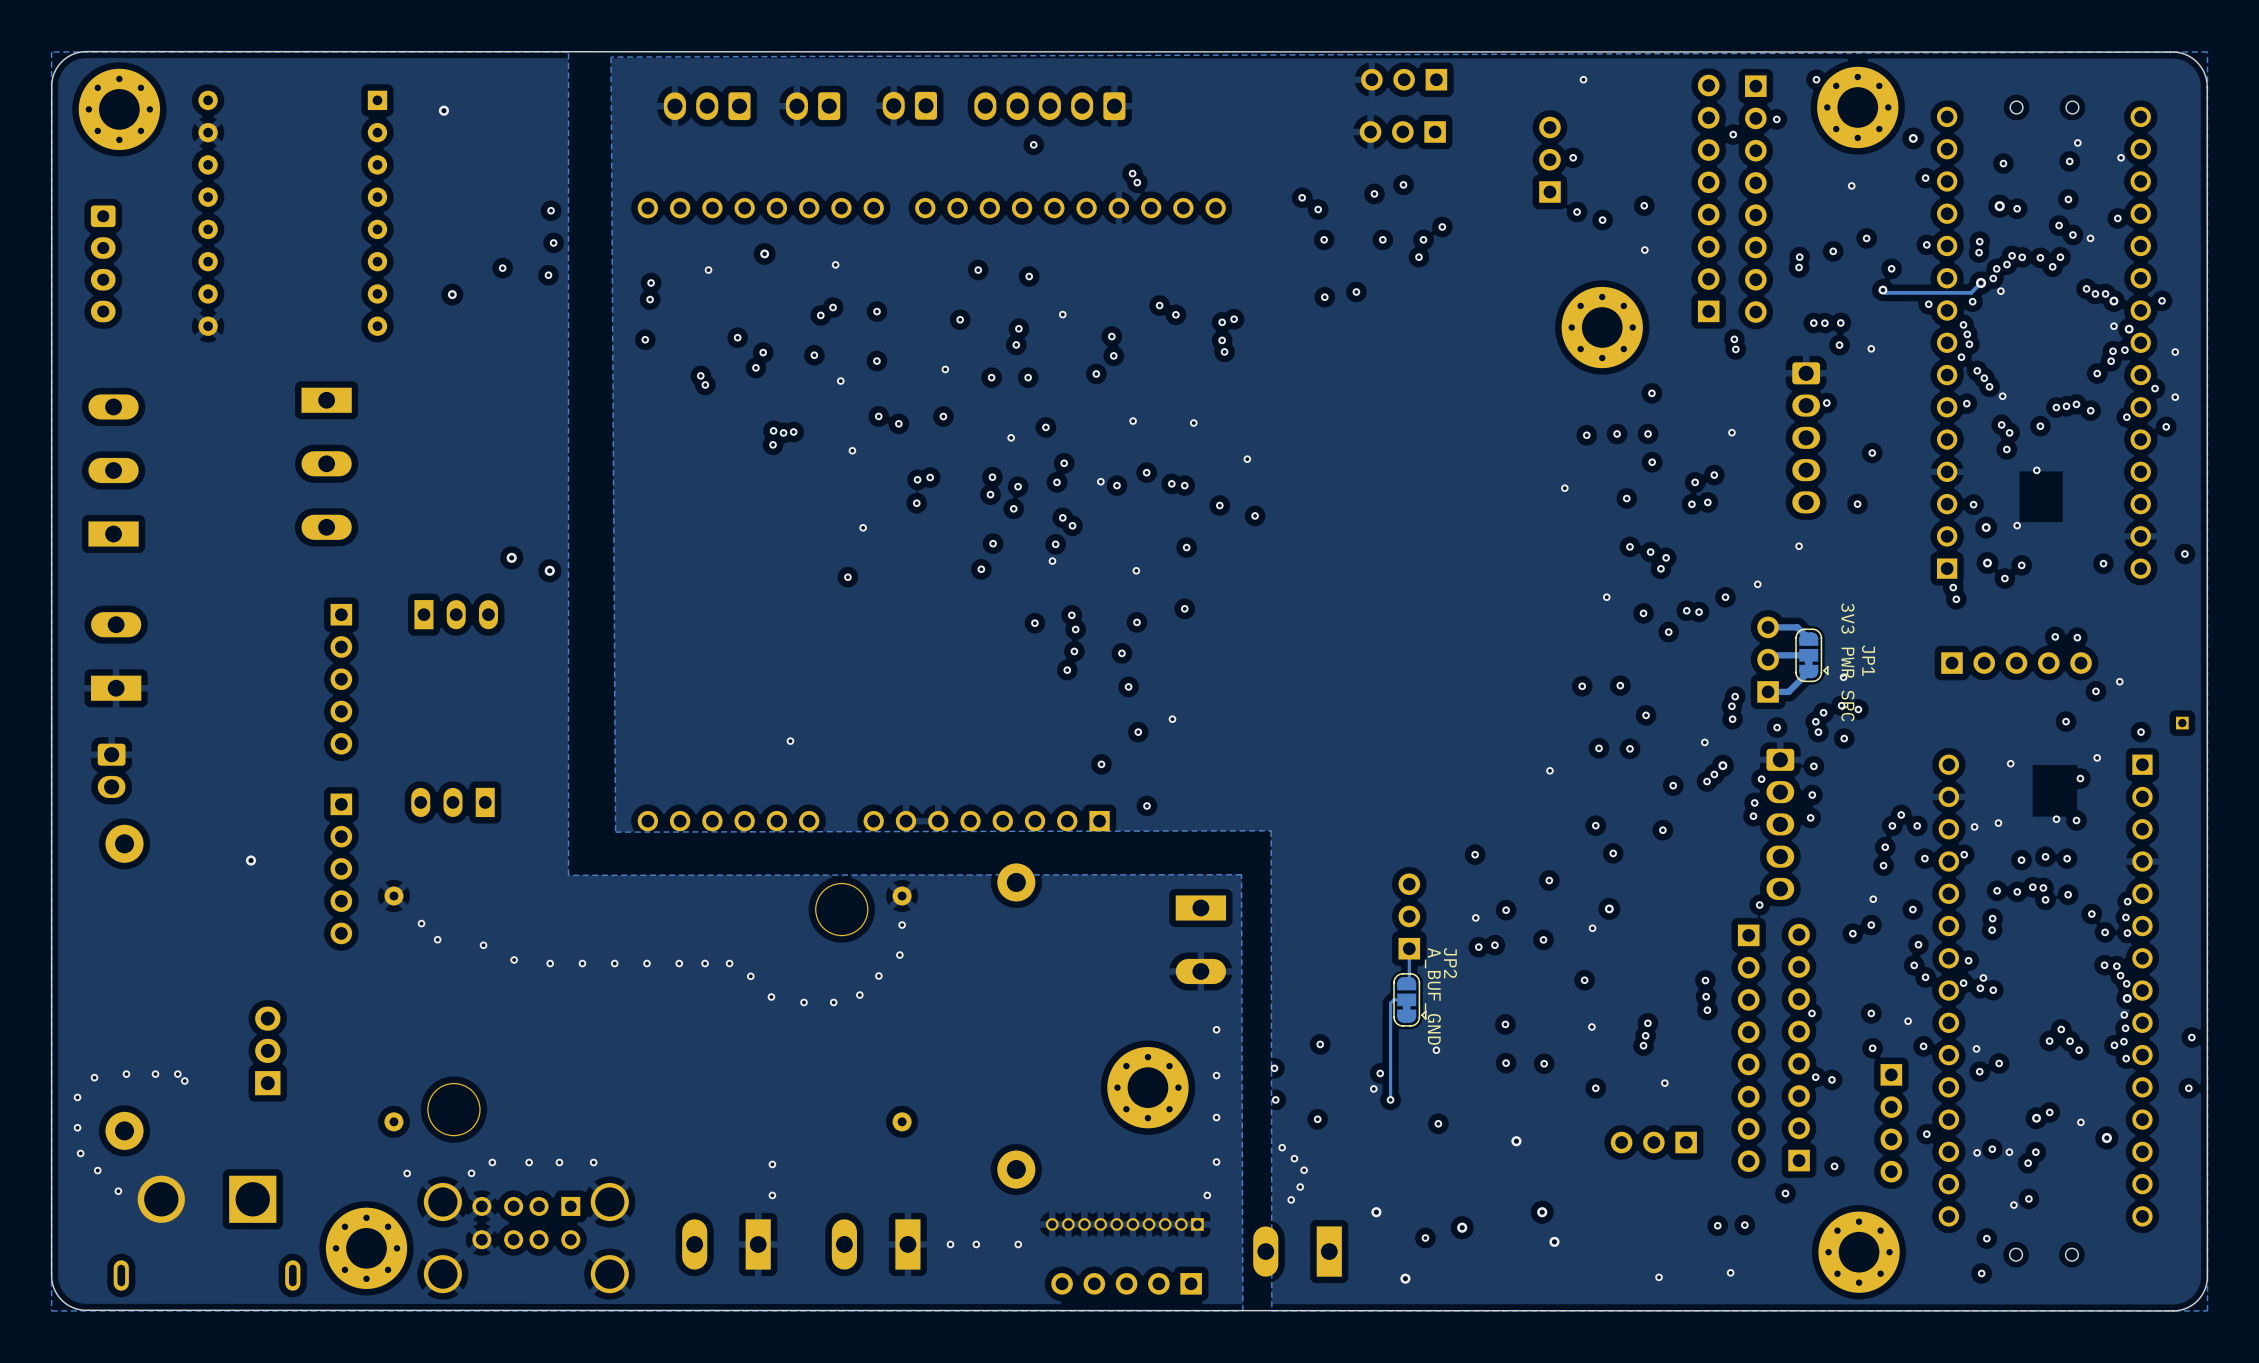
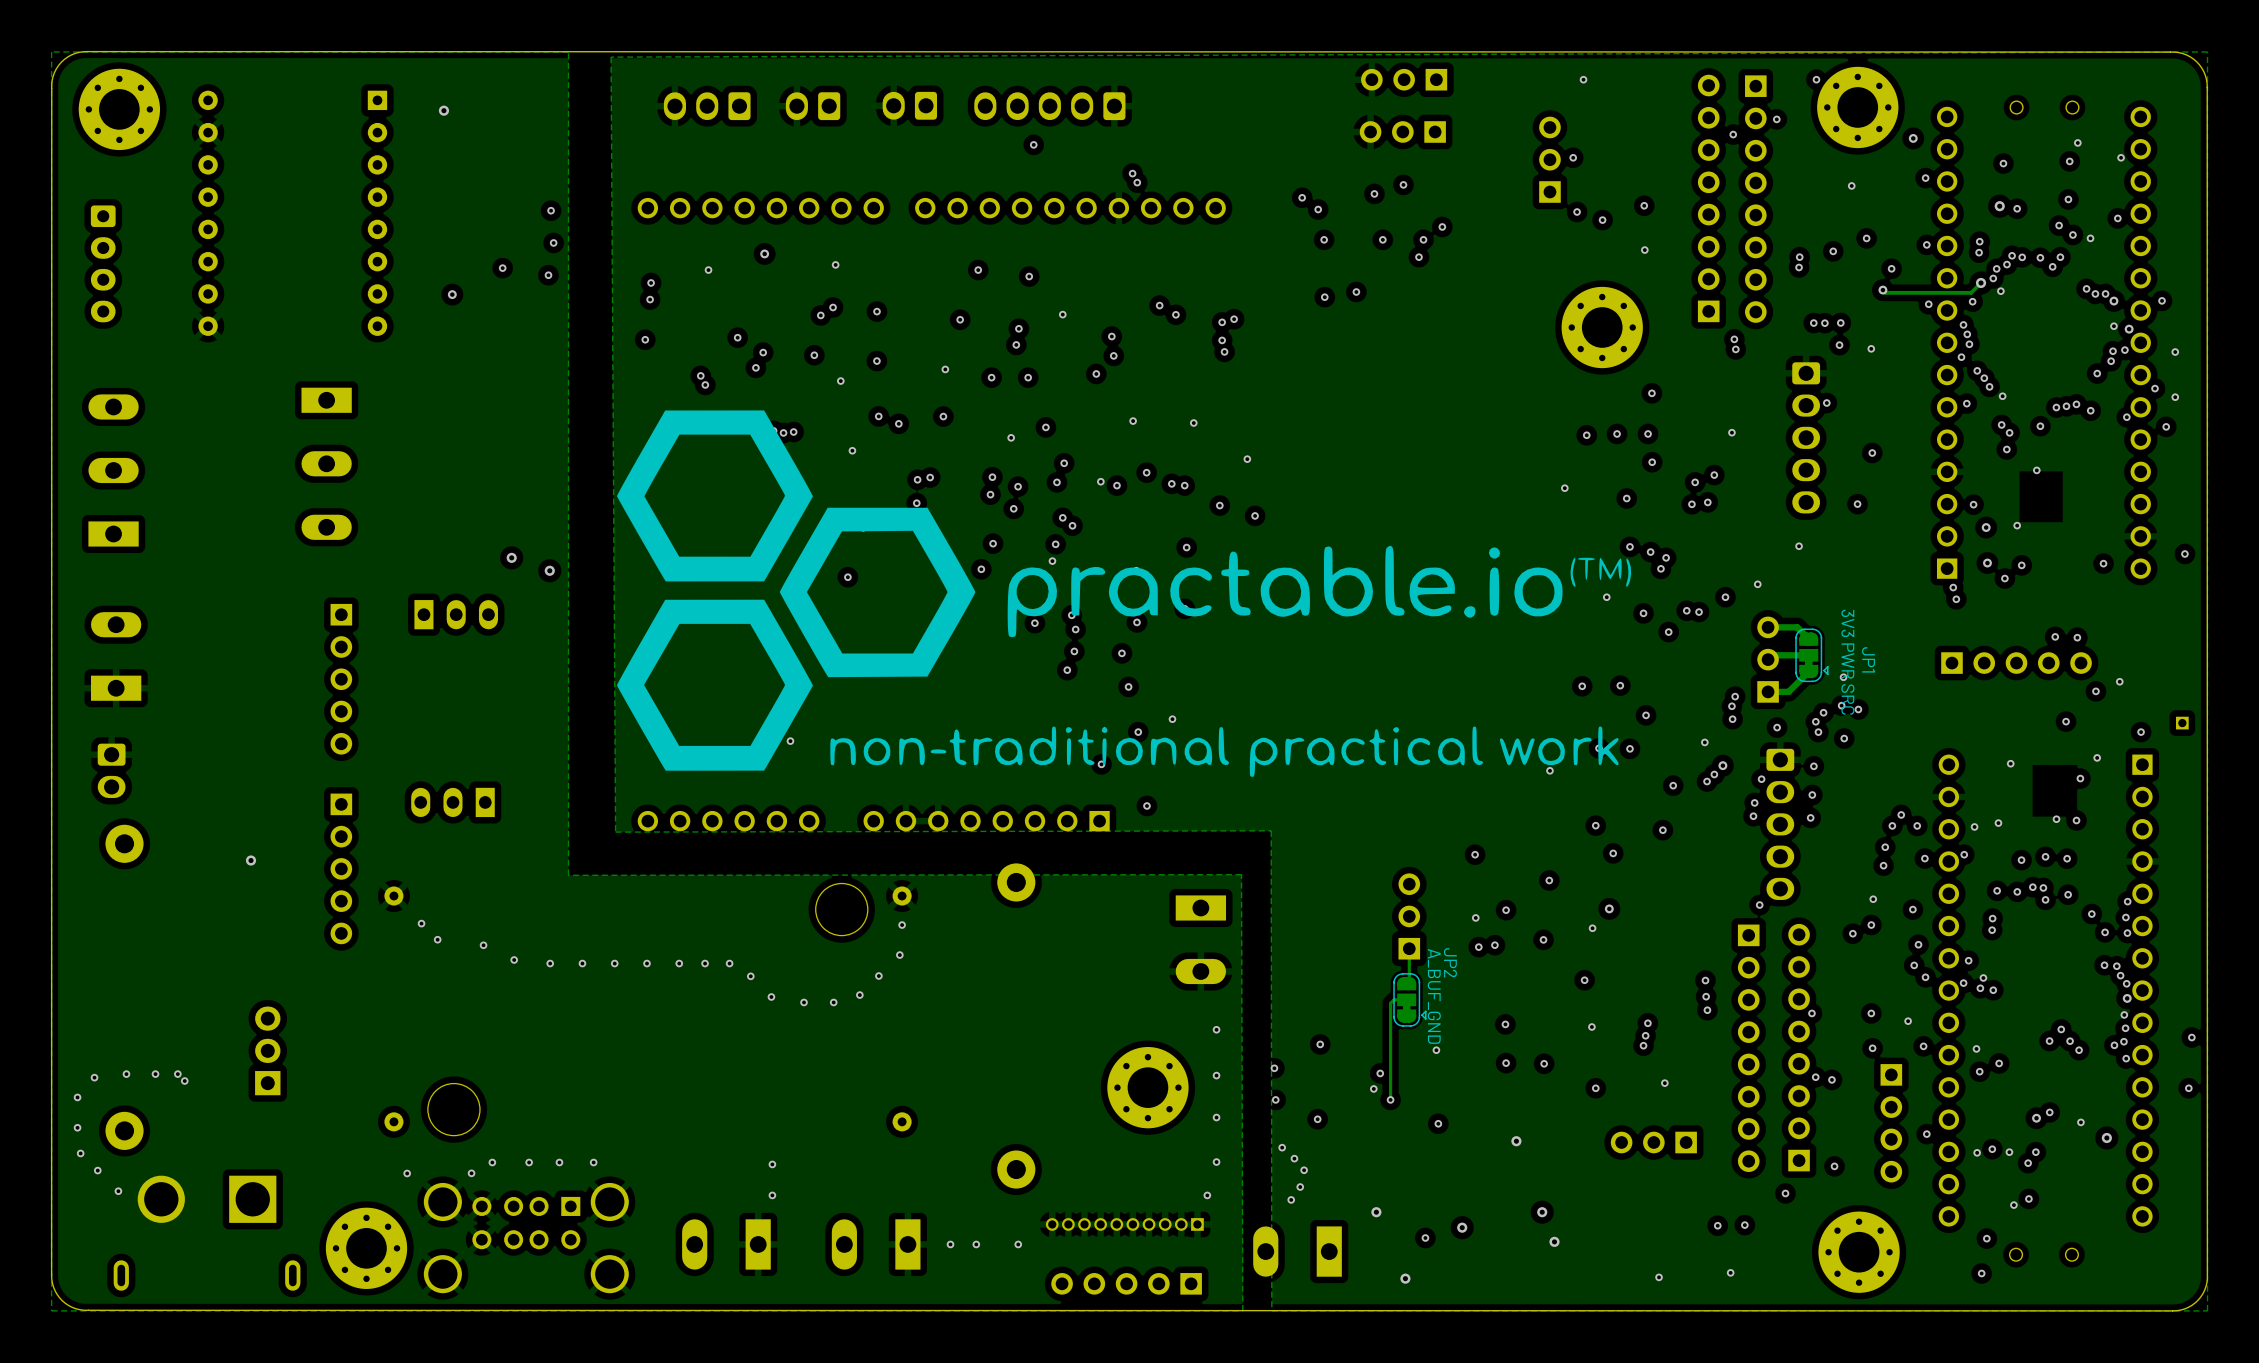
drawing: none -> [616, 410, 1632, 777]

